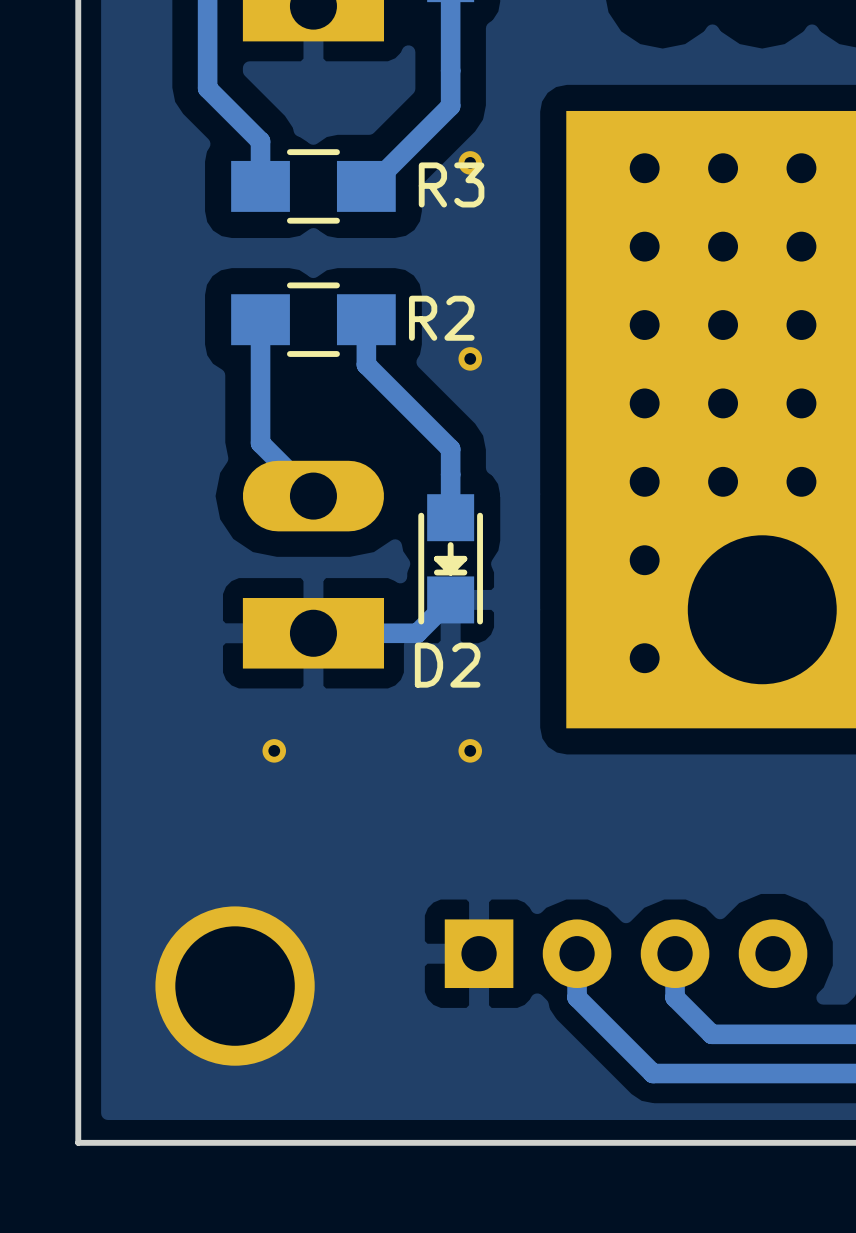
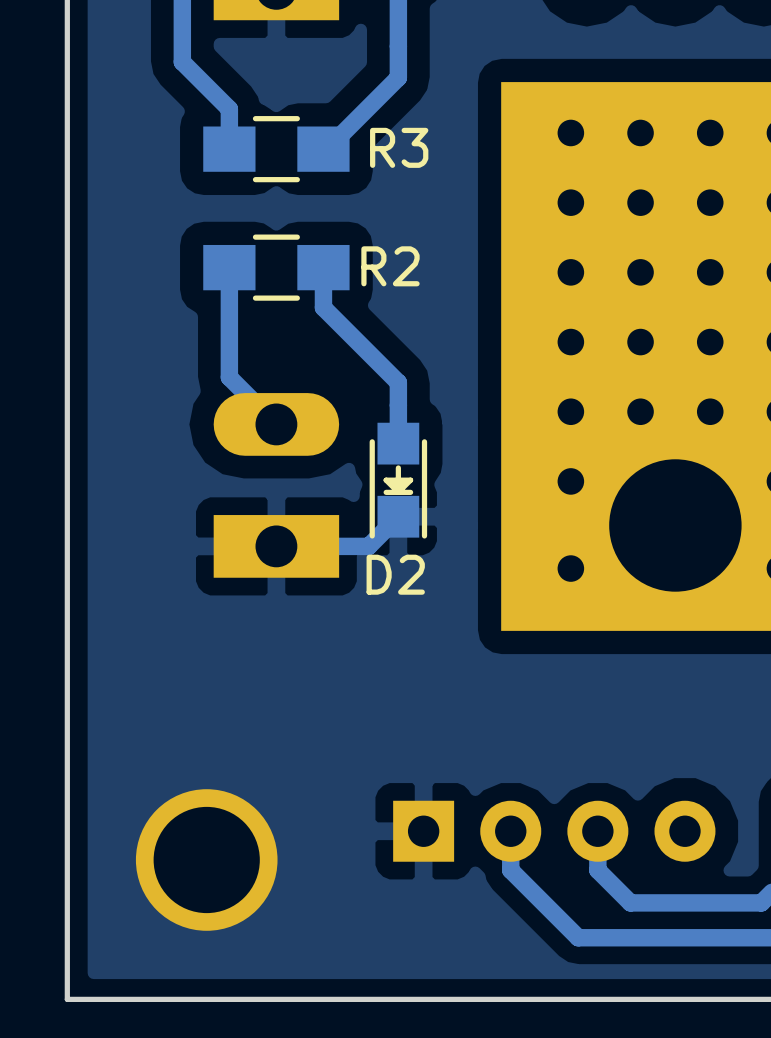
part: (470, 162) -> none
part: (470, 358) -> none
part: (274, 750) -> none
part: (470, 750) -> none

